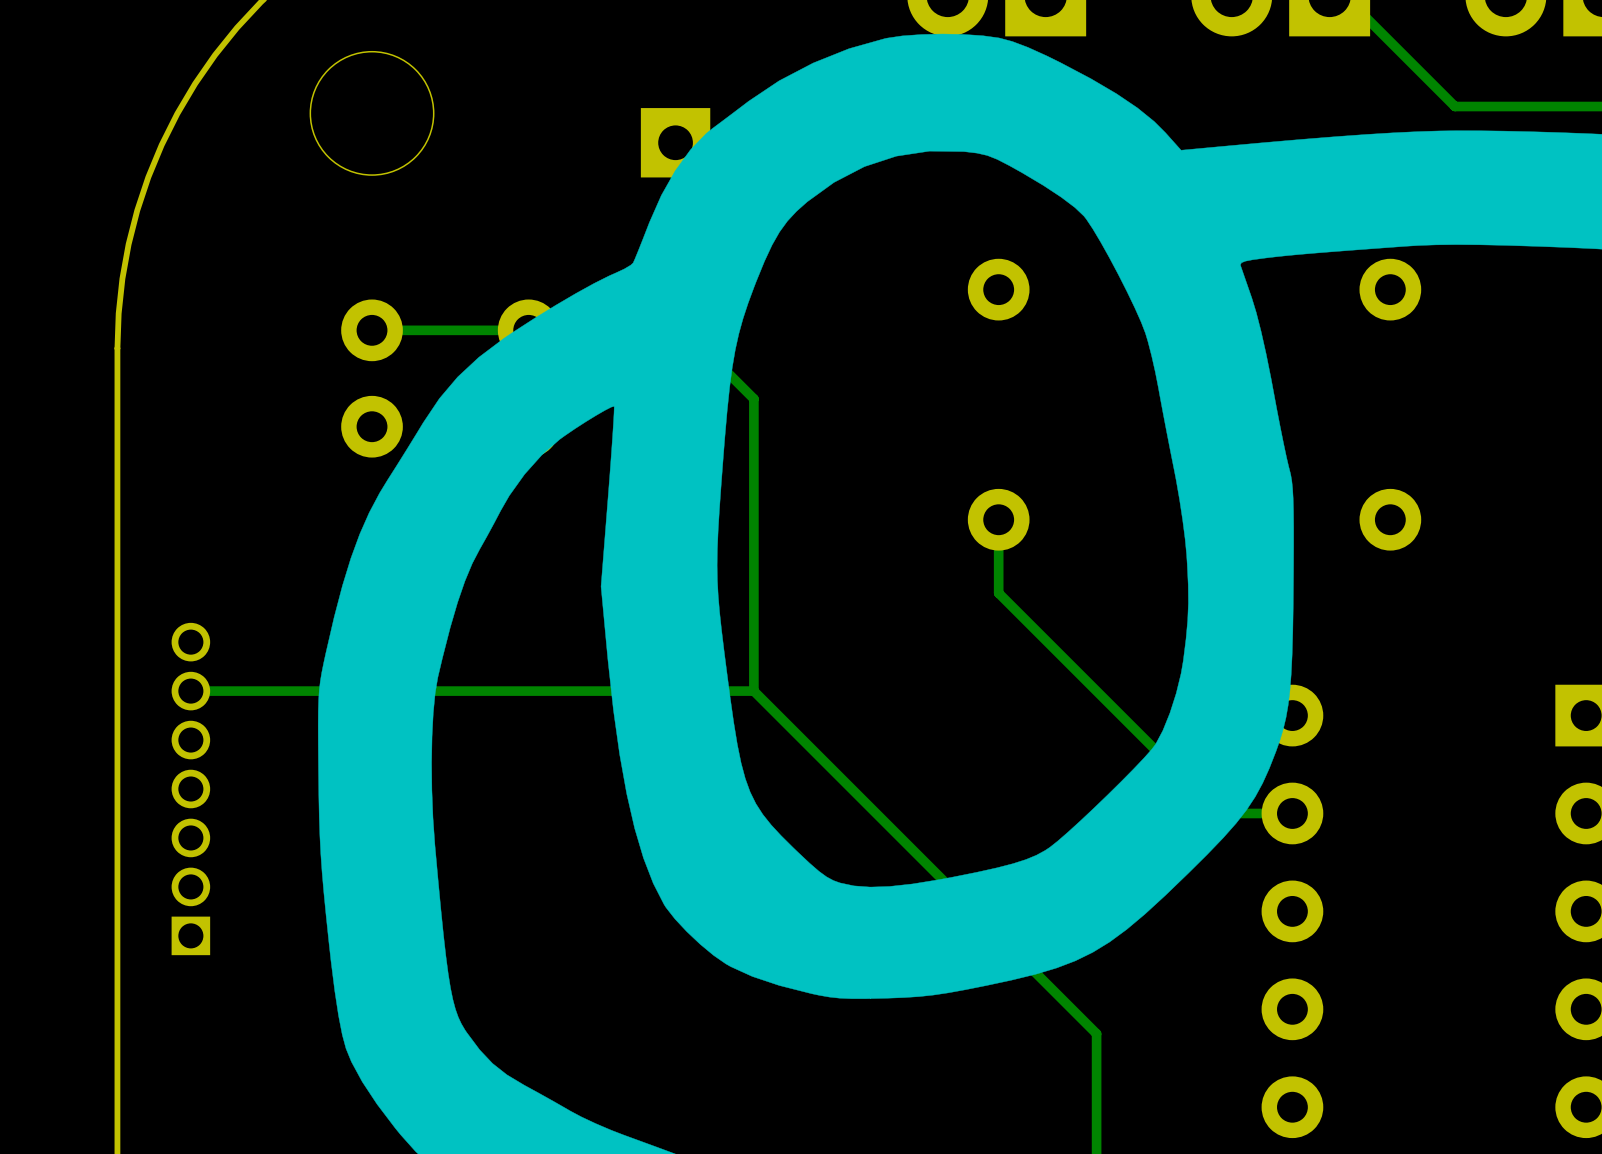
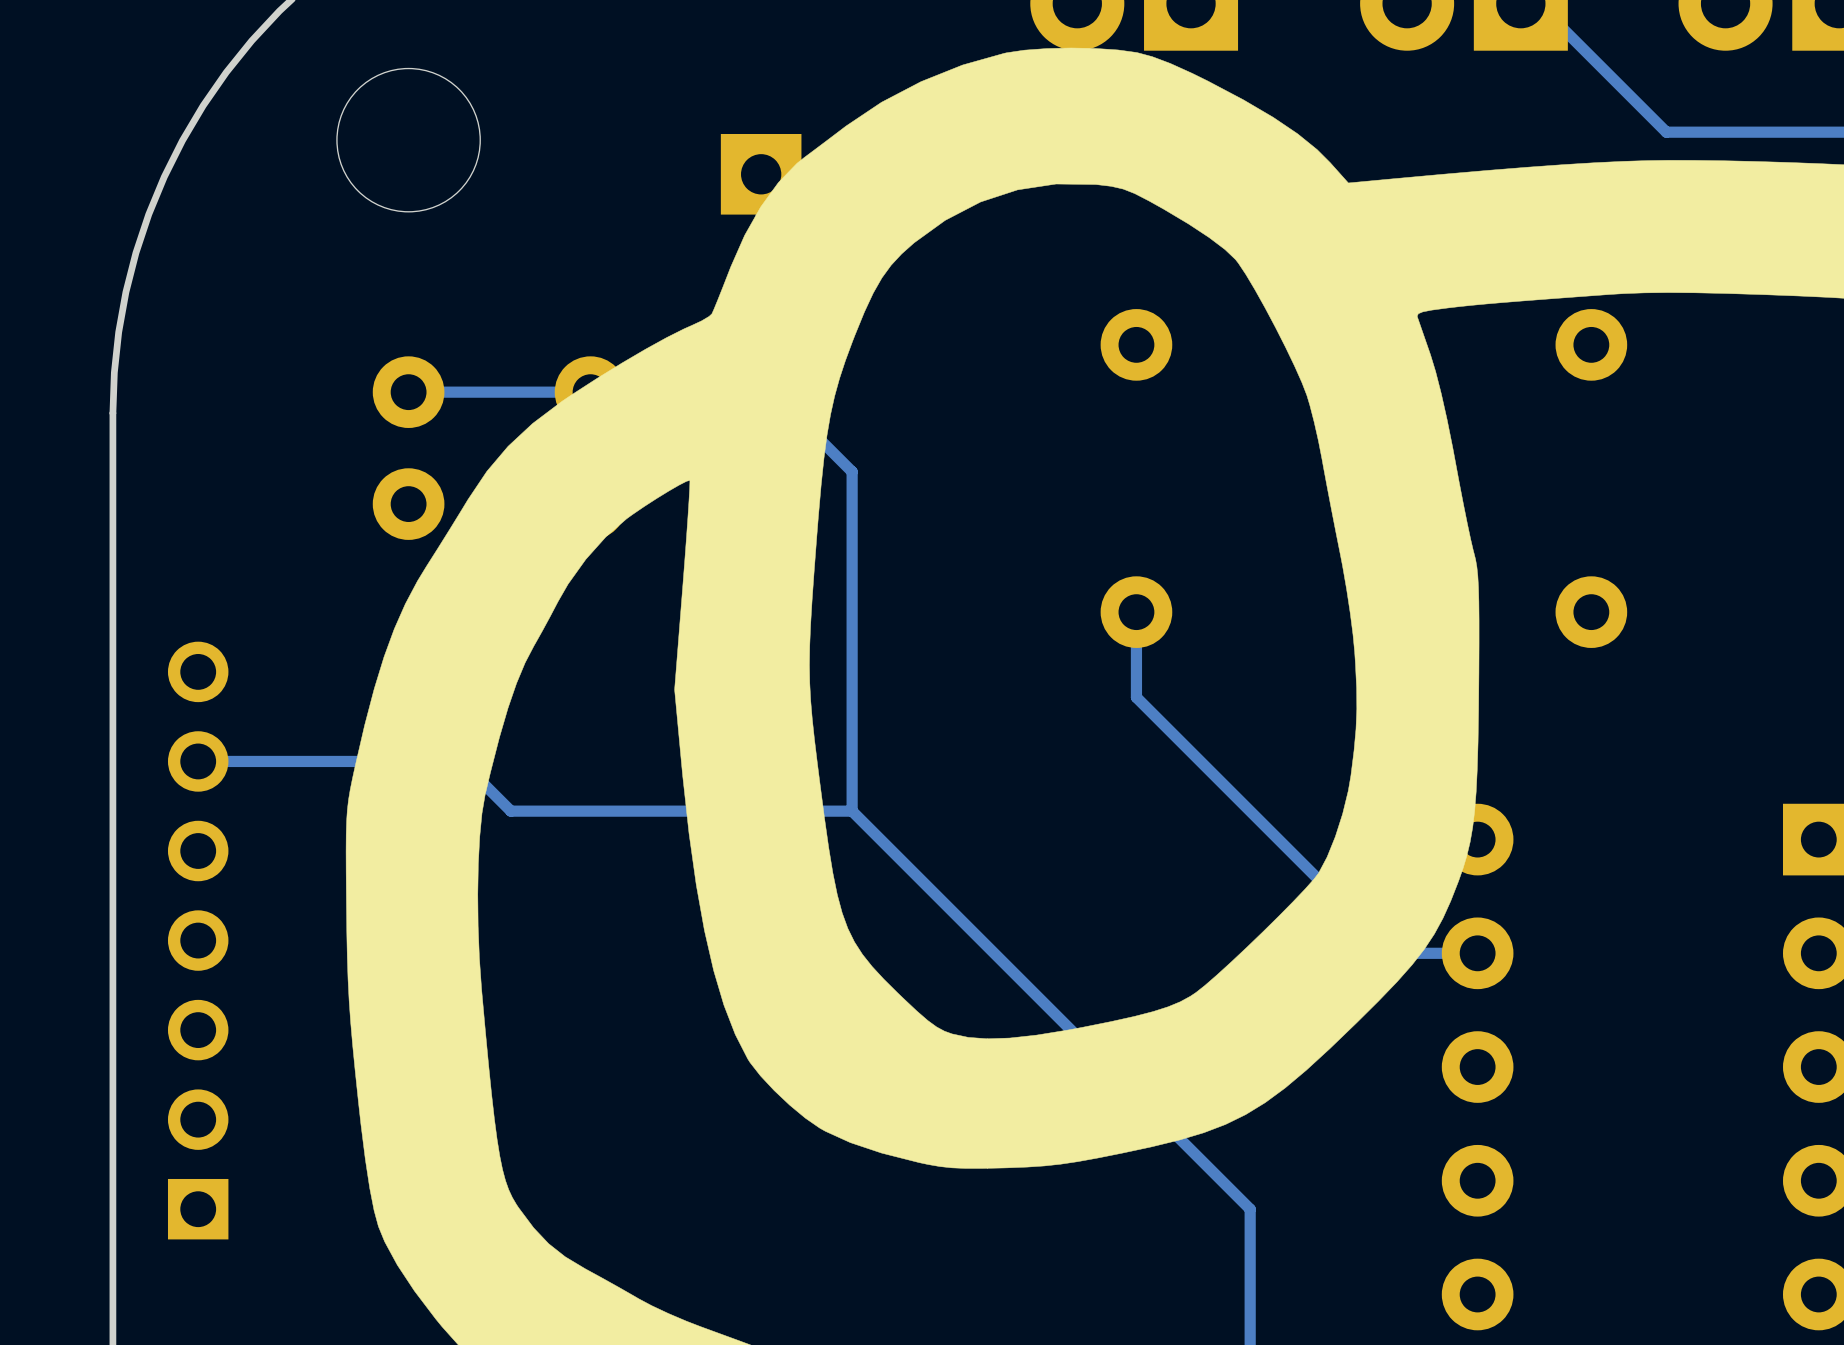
part footprint: [171, 622, 211, 956] -> [167, 641, 229, 1240]
track: (460, 691) (190, 691) -> (510, 811) (461, 761) (198, 761)

